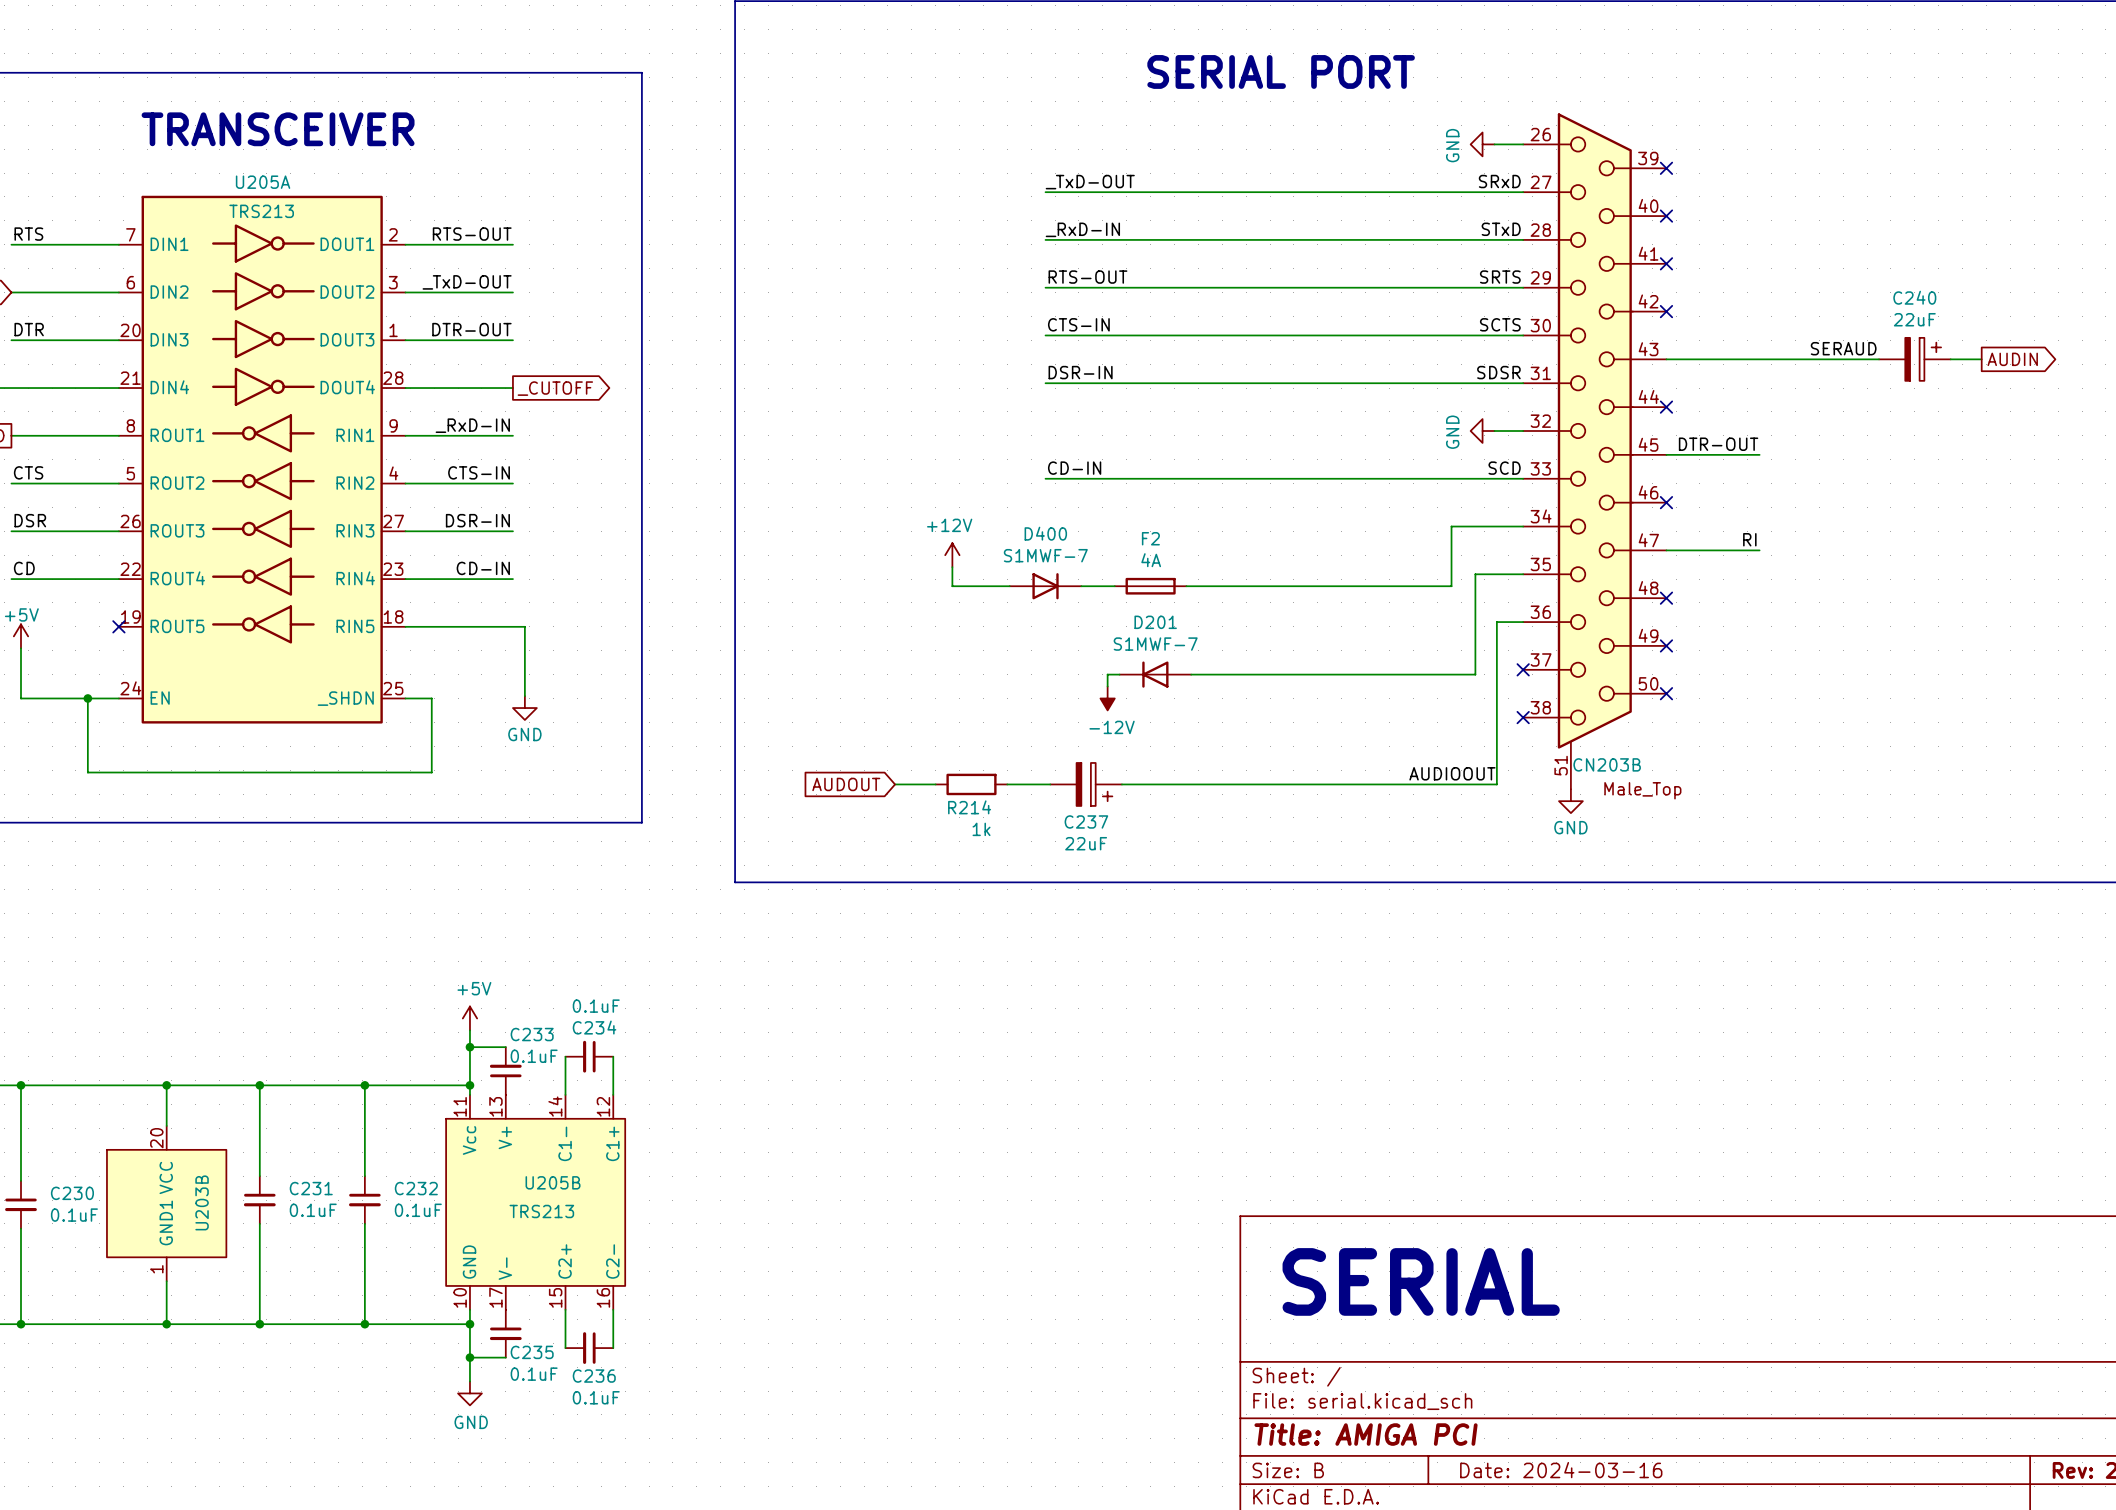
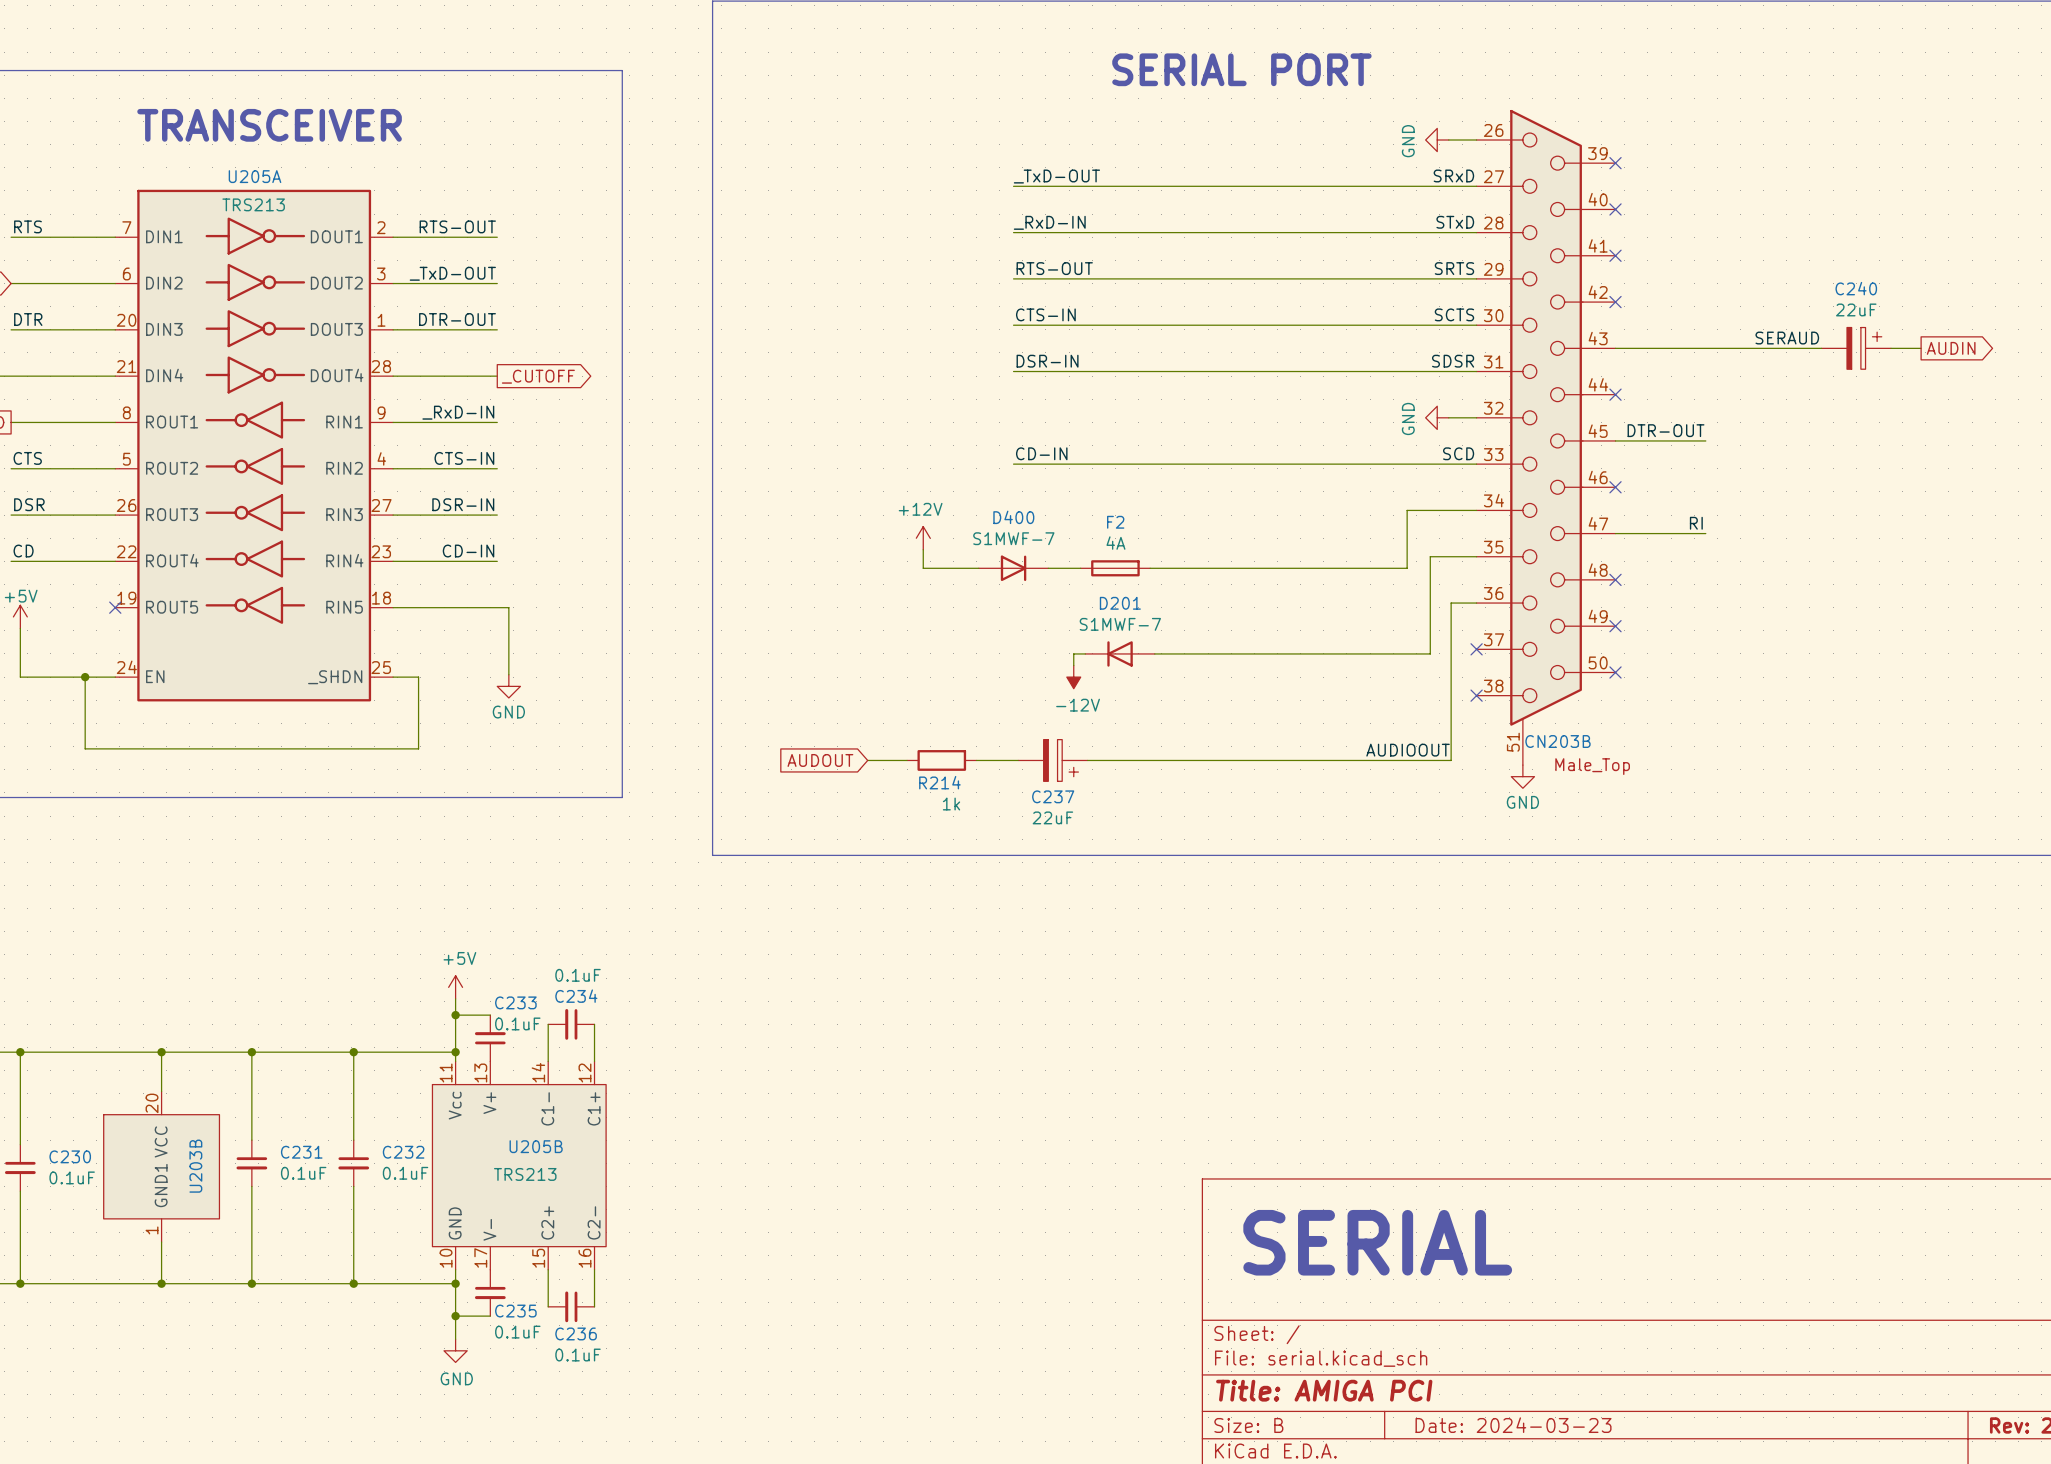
title block: Date: 2024-03-16 (1561, 1470) -> Date: 2024-03-23 (1513, 1425)

